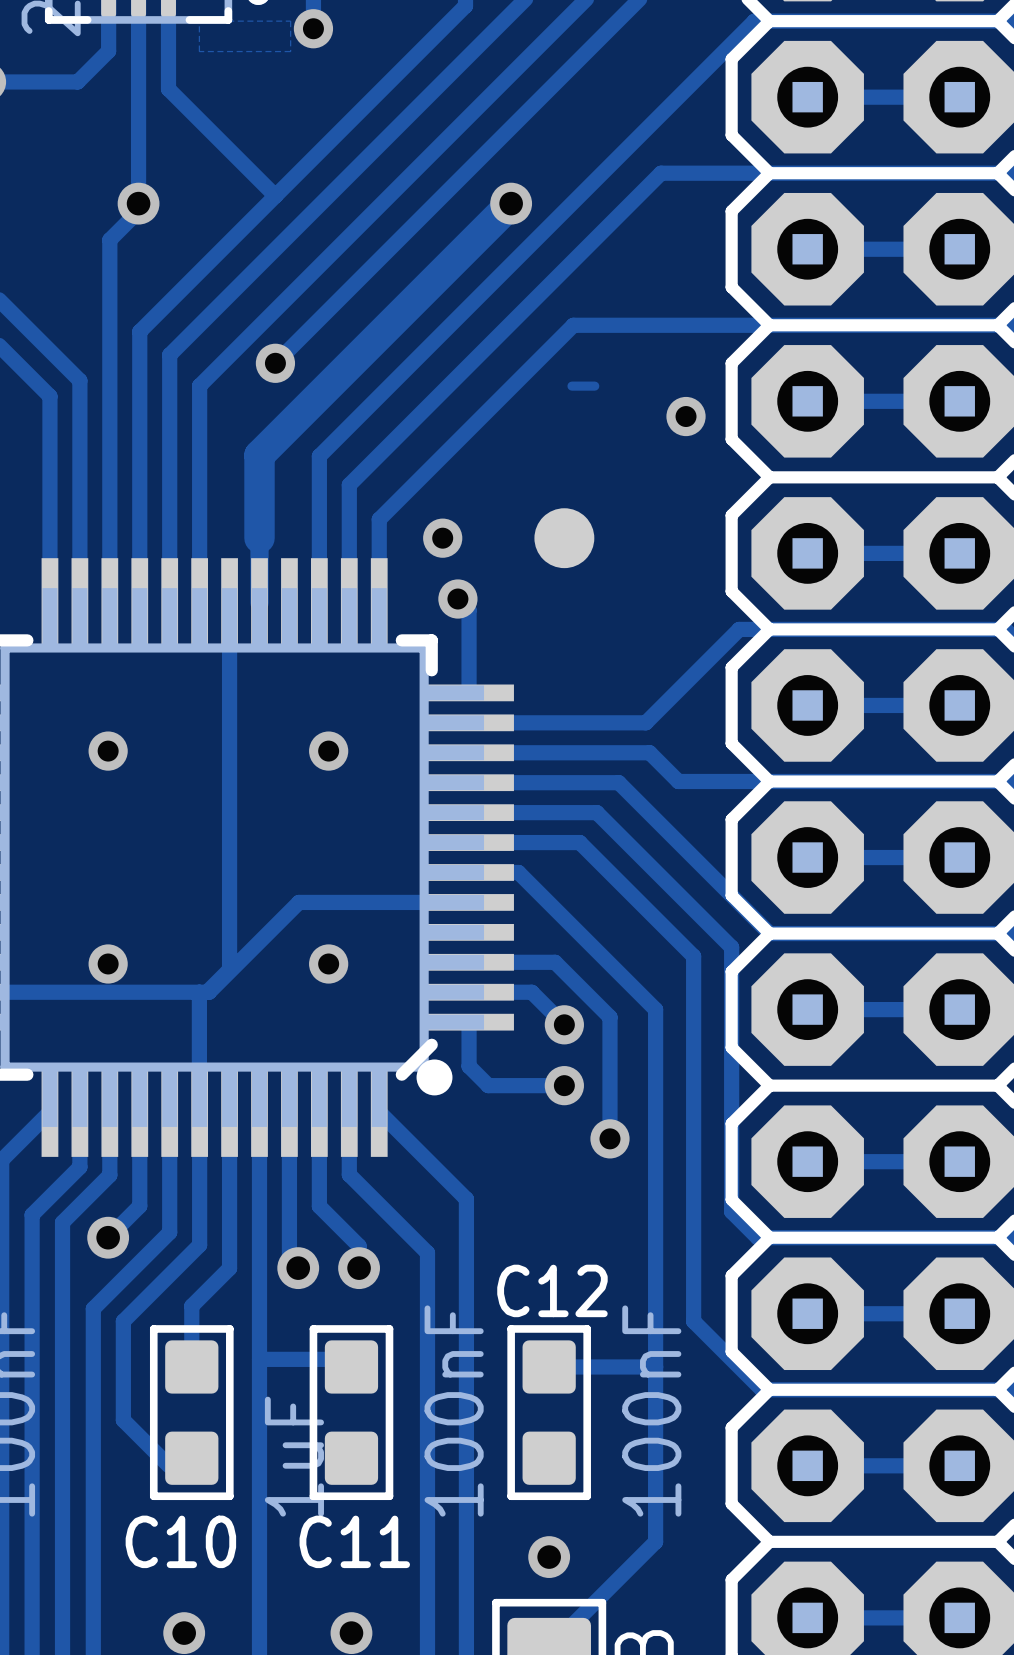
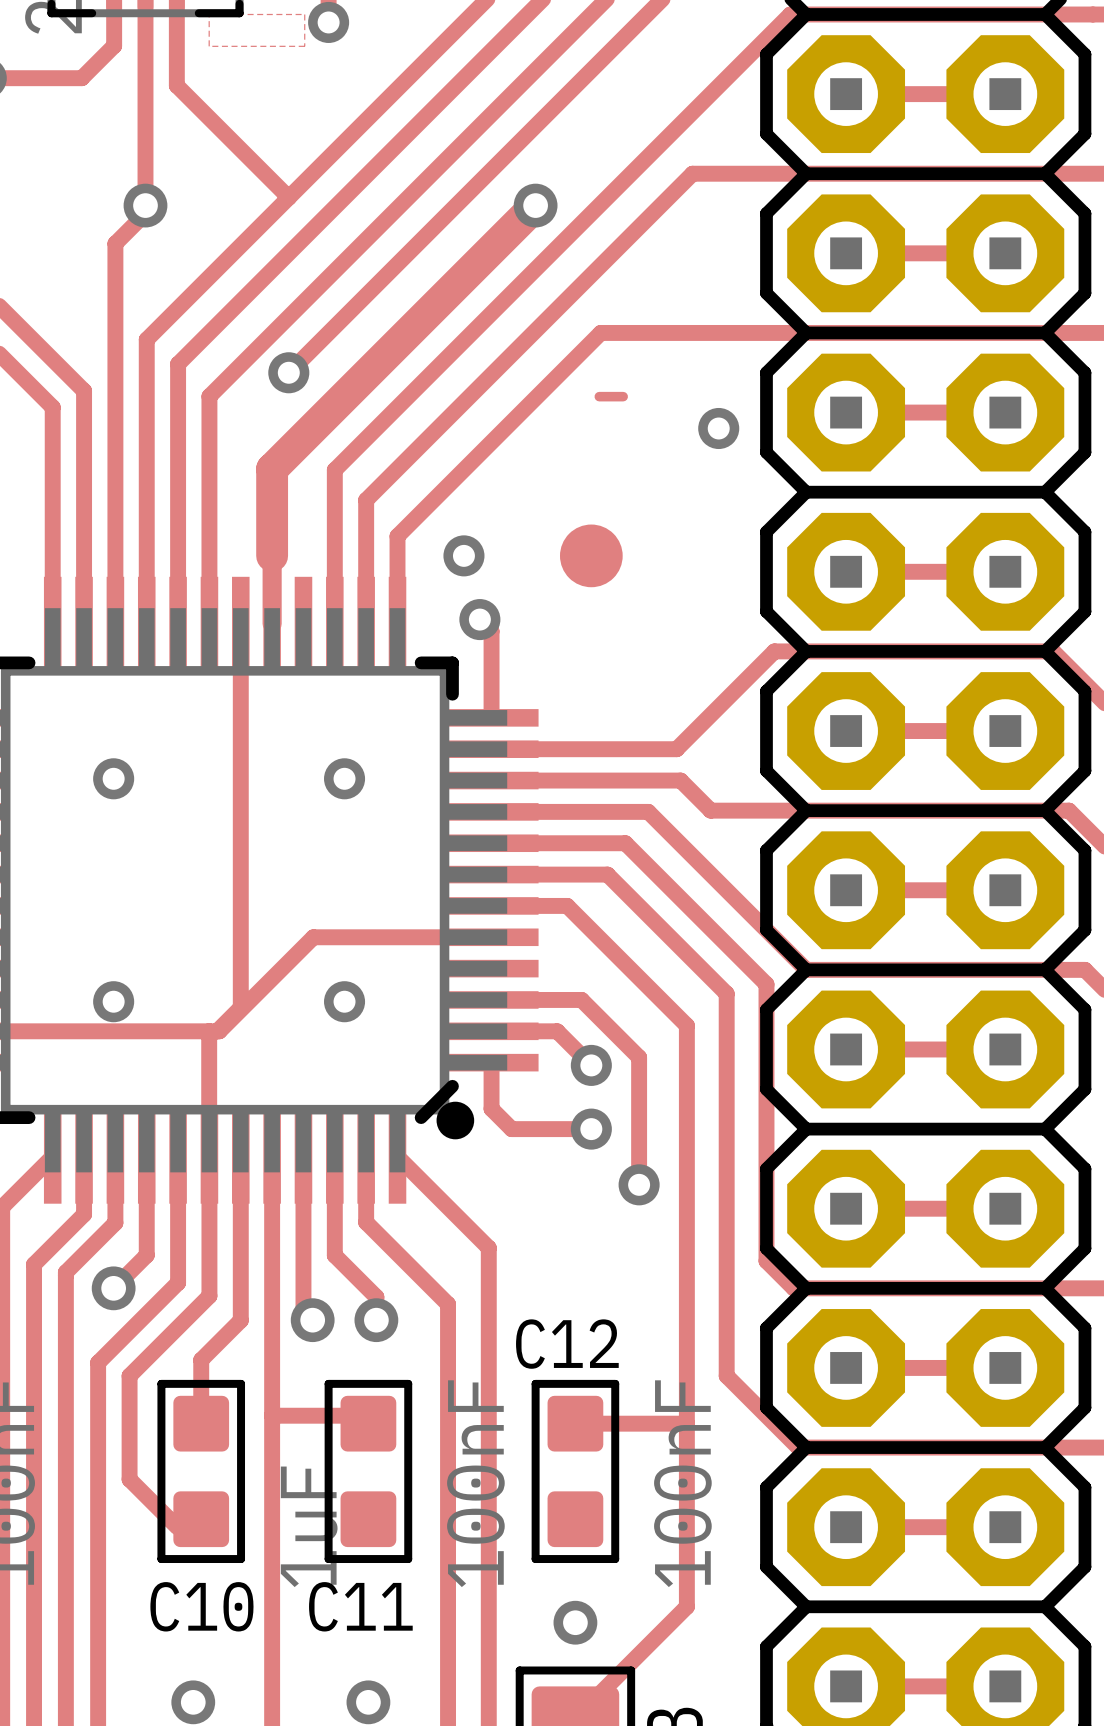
track: (518, 872) (655, 1009) -> (543, 905) (567, 905) (686, 1025) (686, 1049)

